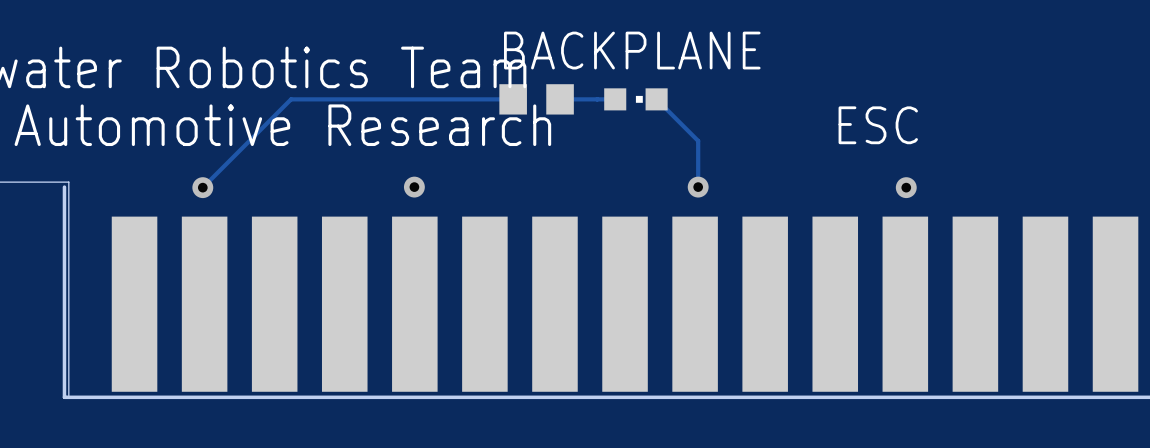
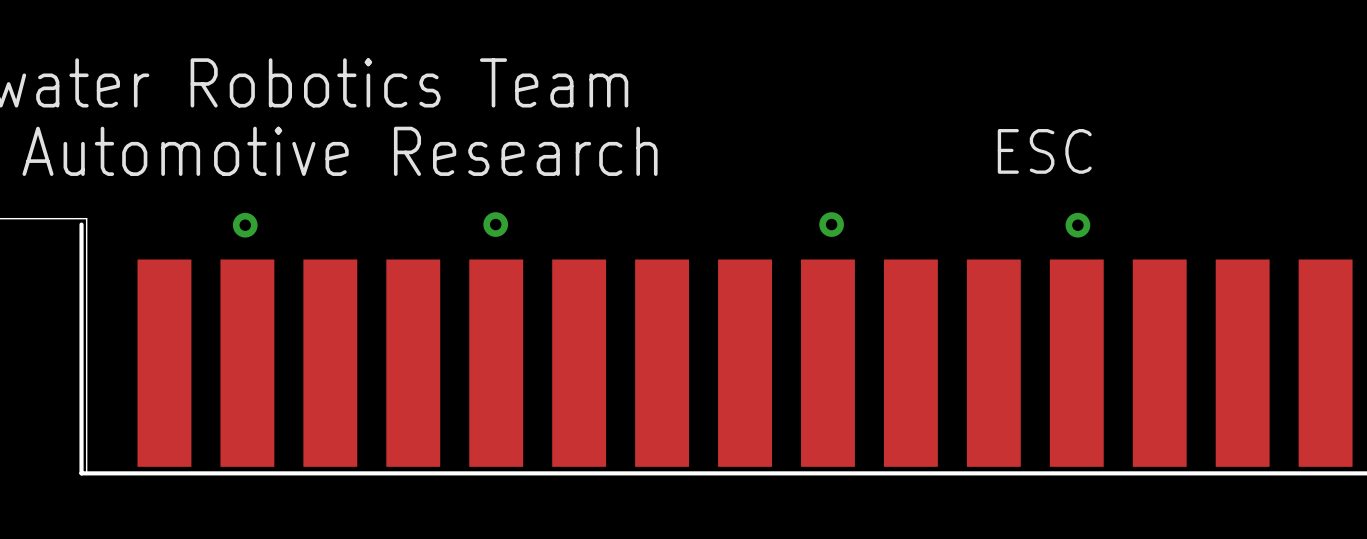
track: (513, 99) (291, 99) (202, 187) -> none
part: (536, 99) -> none
track: (560, 99) (615, 99) -> none
BACKPLANE: (635, 99) -> none
track: (656, 99) (698, 140) (698, 187) -> none

